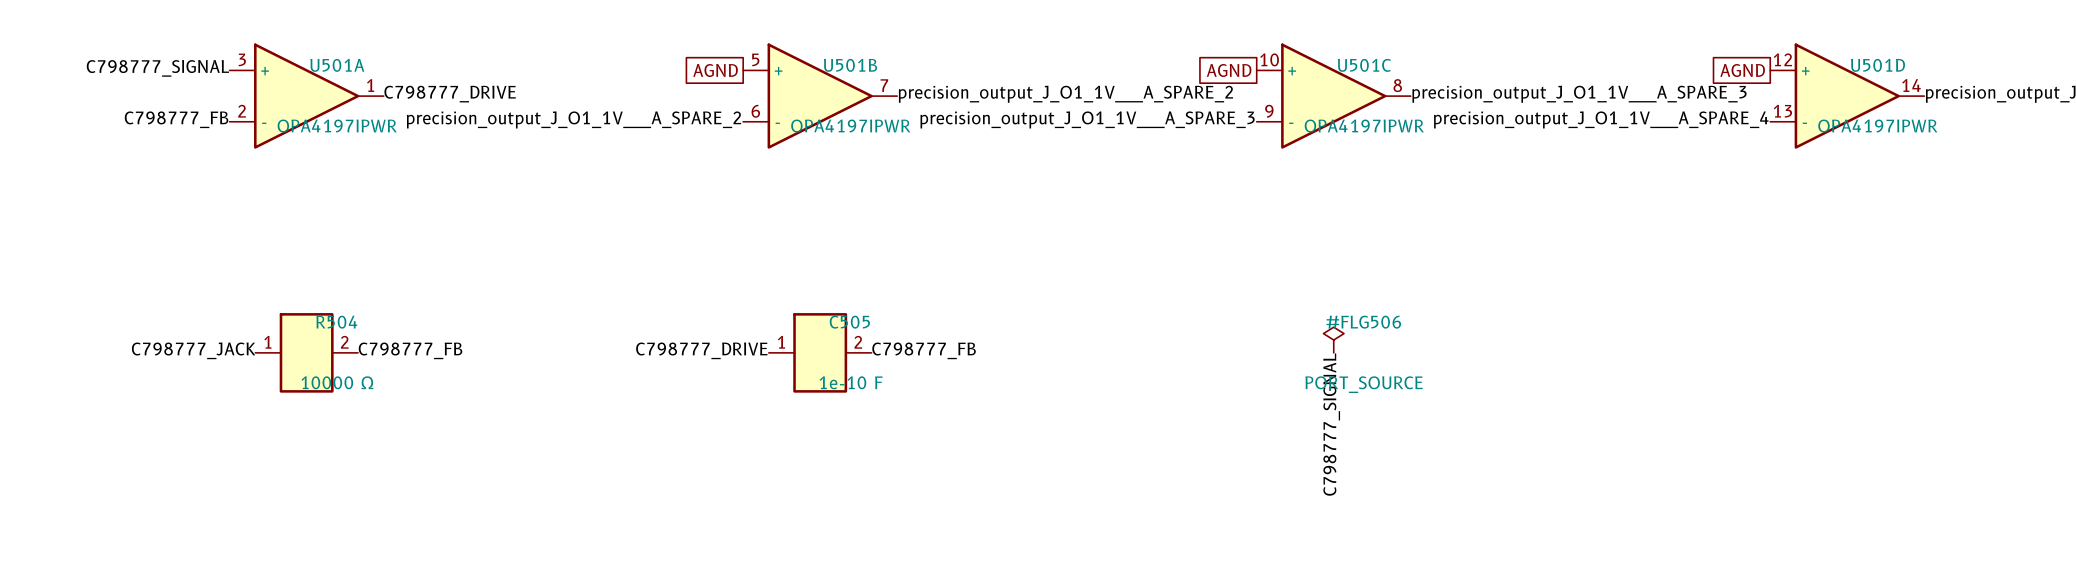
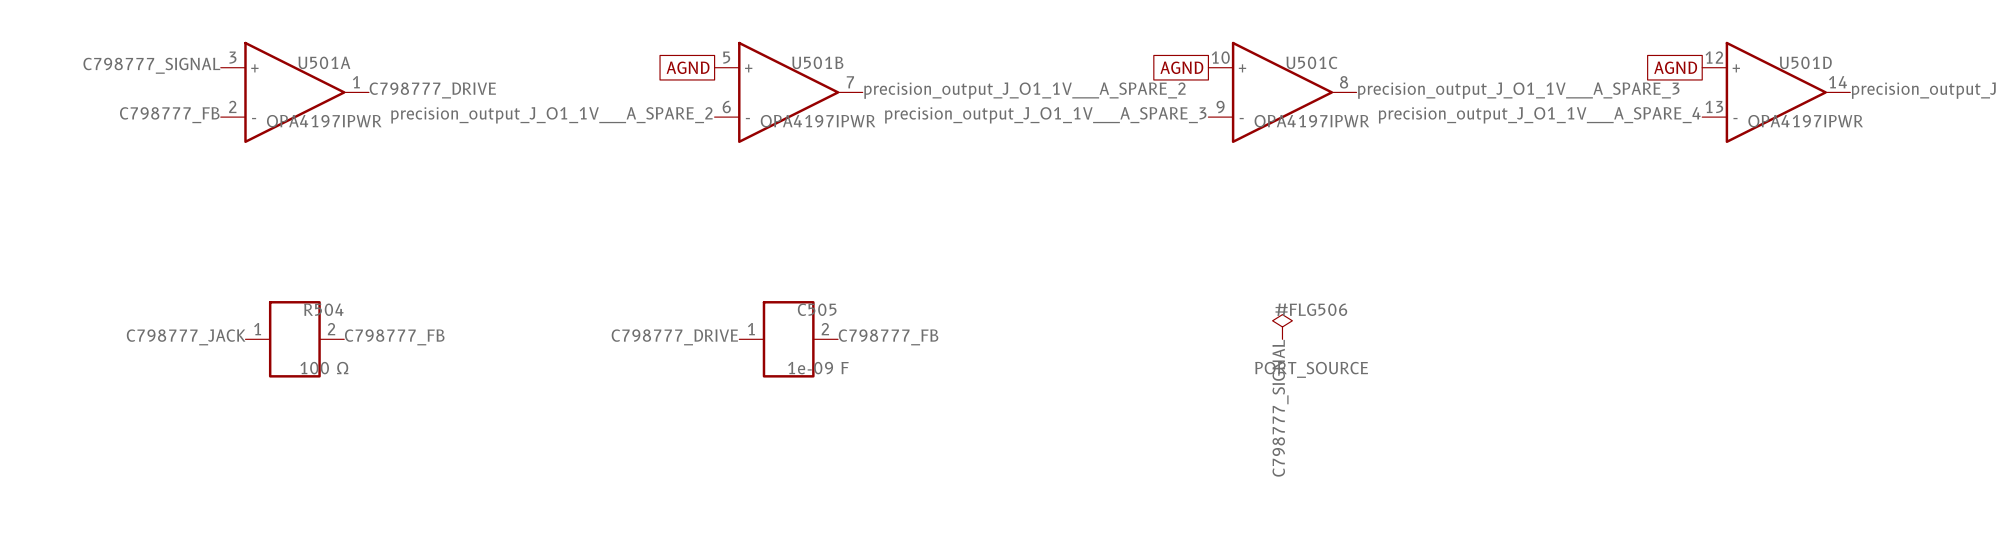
R504 value: 10000 Ω (337, 382) -> 100 Ω (324, 368)
C505 value: 1e-10 F (851, 382) -> 1e-09 F (818, 368)

